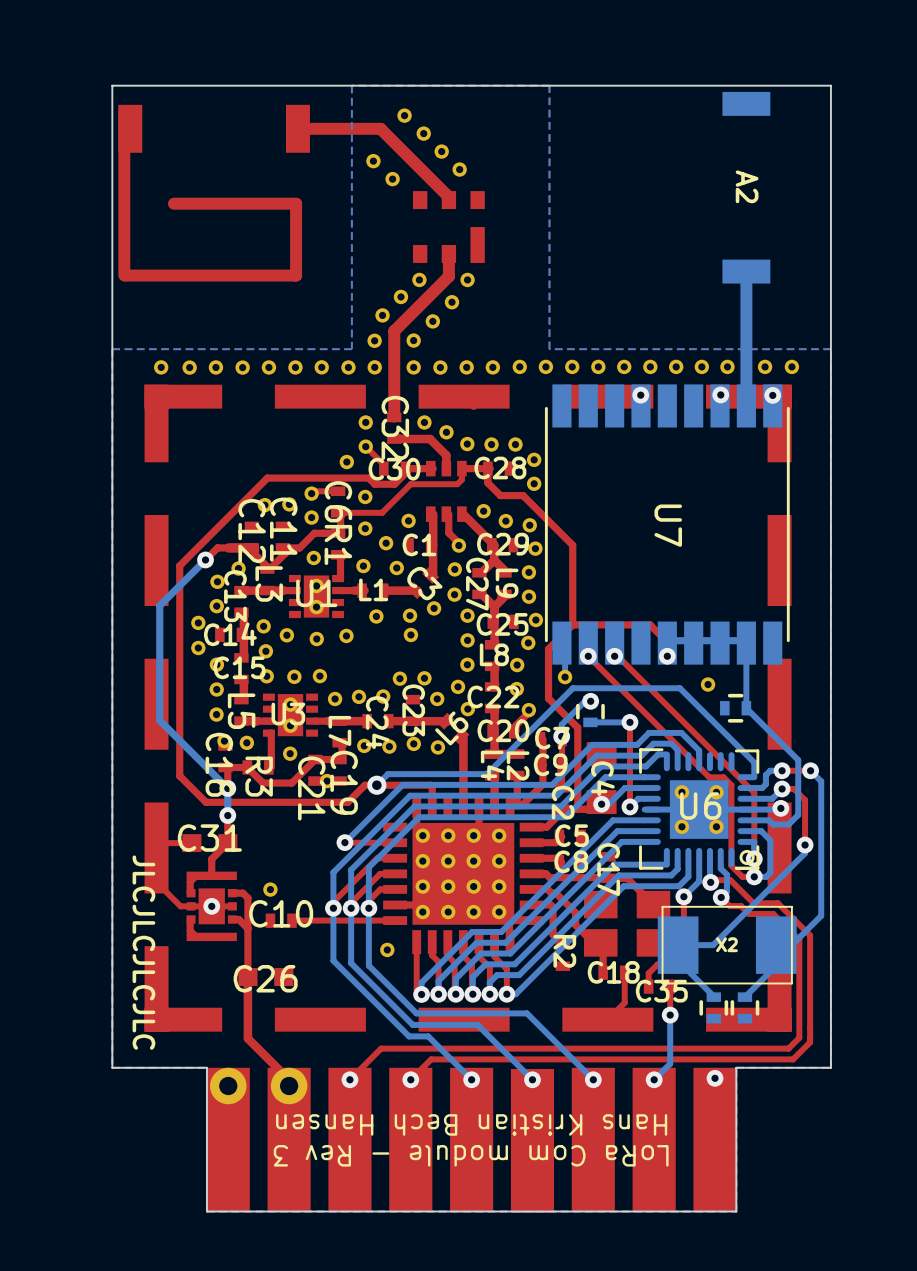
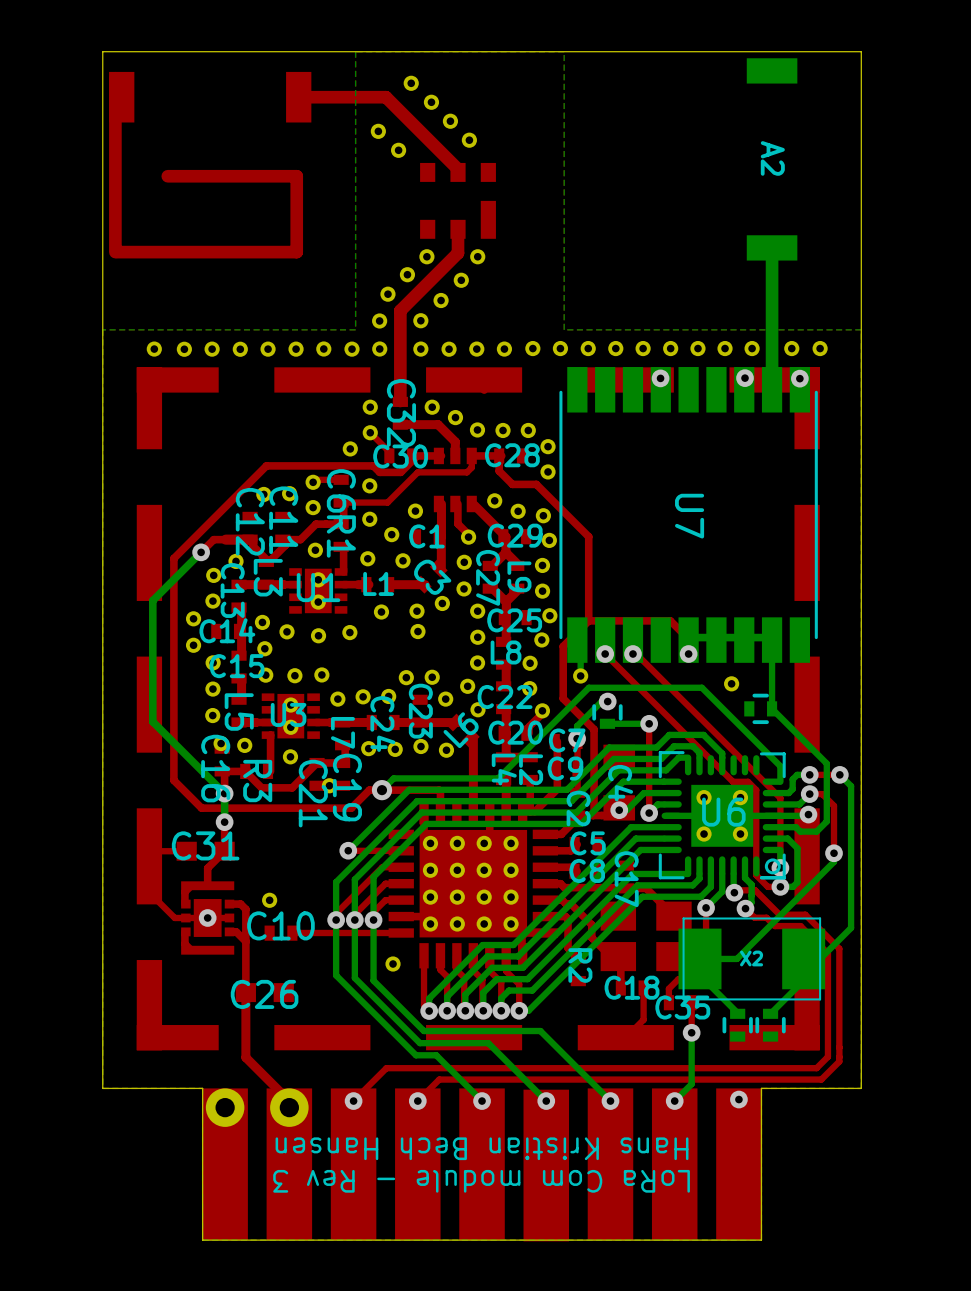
text: JLCJLCJLCJLC (143, 952) -> none

